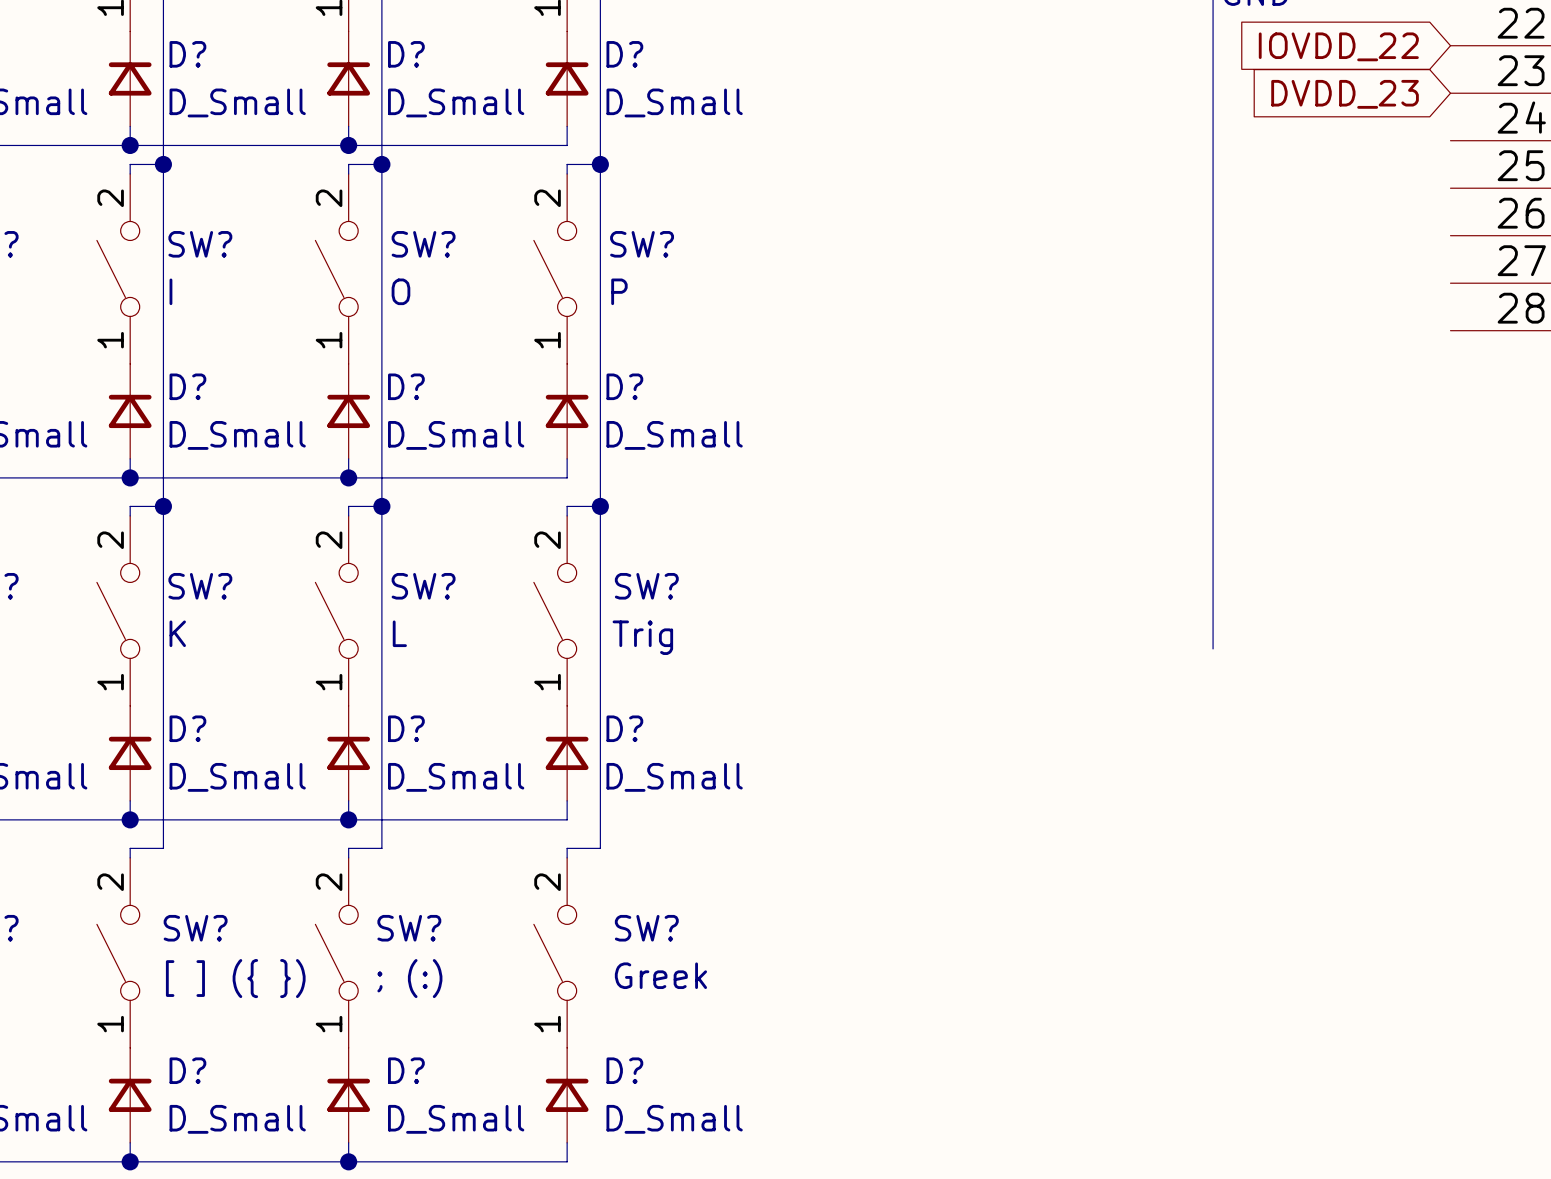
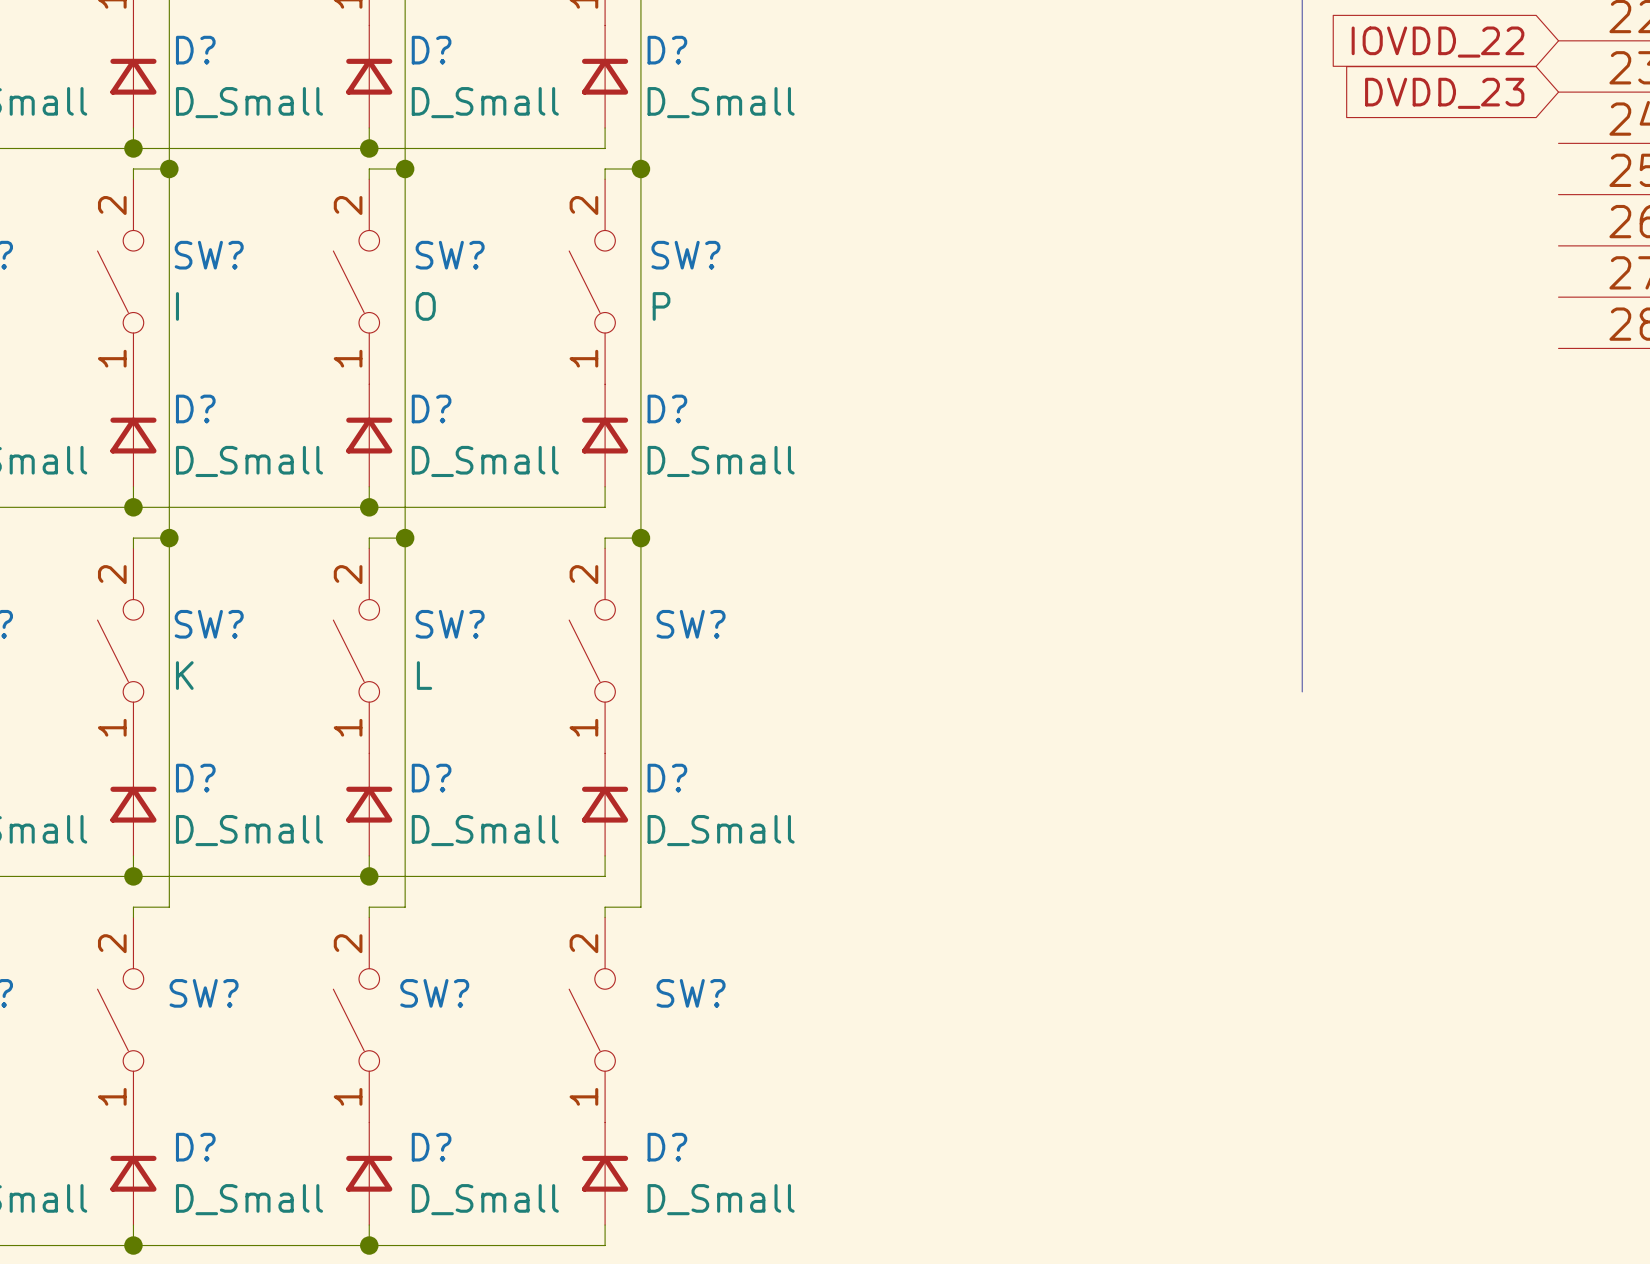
SW? value: Trig (642, 637) -> none
SW? value: Greek (660, 975) -> none
SW? value: [ ] ({ }) (235, 978) -> none
SW? value: ; (:) (409, 978) -> none

